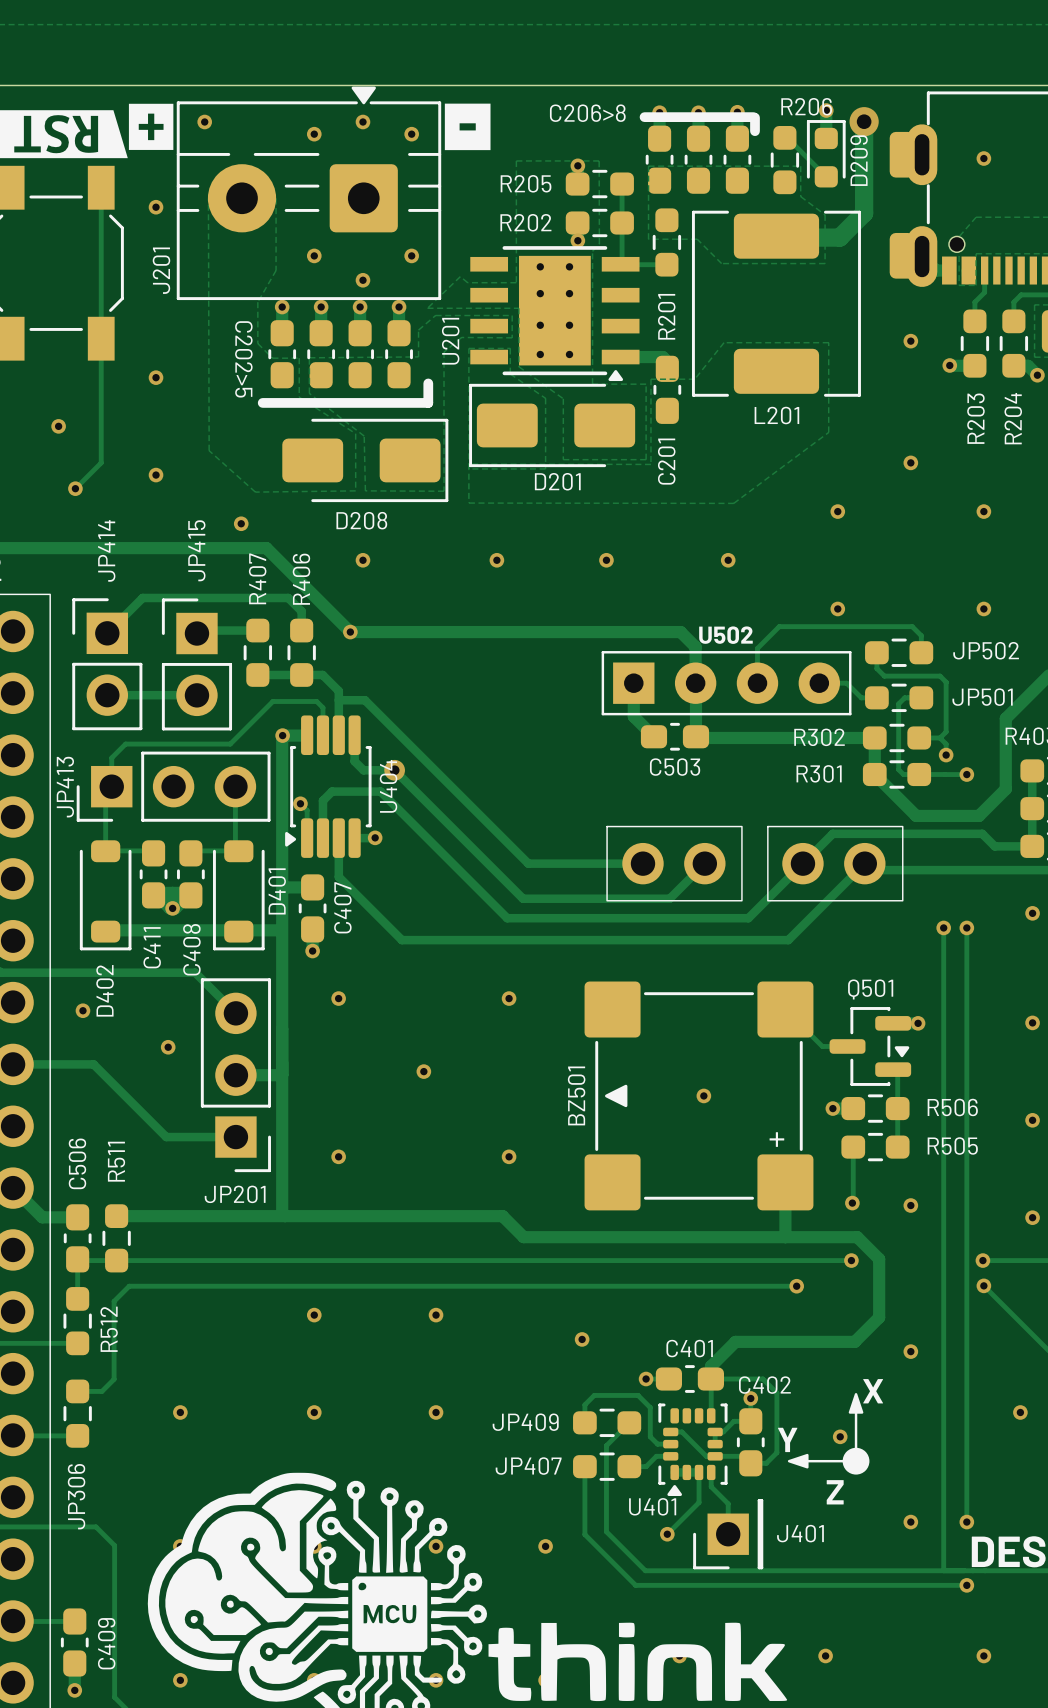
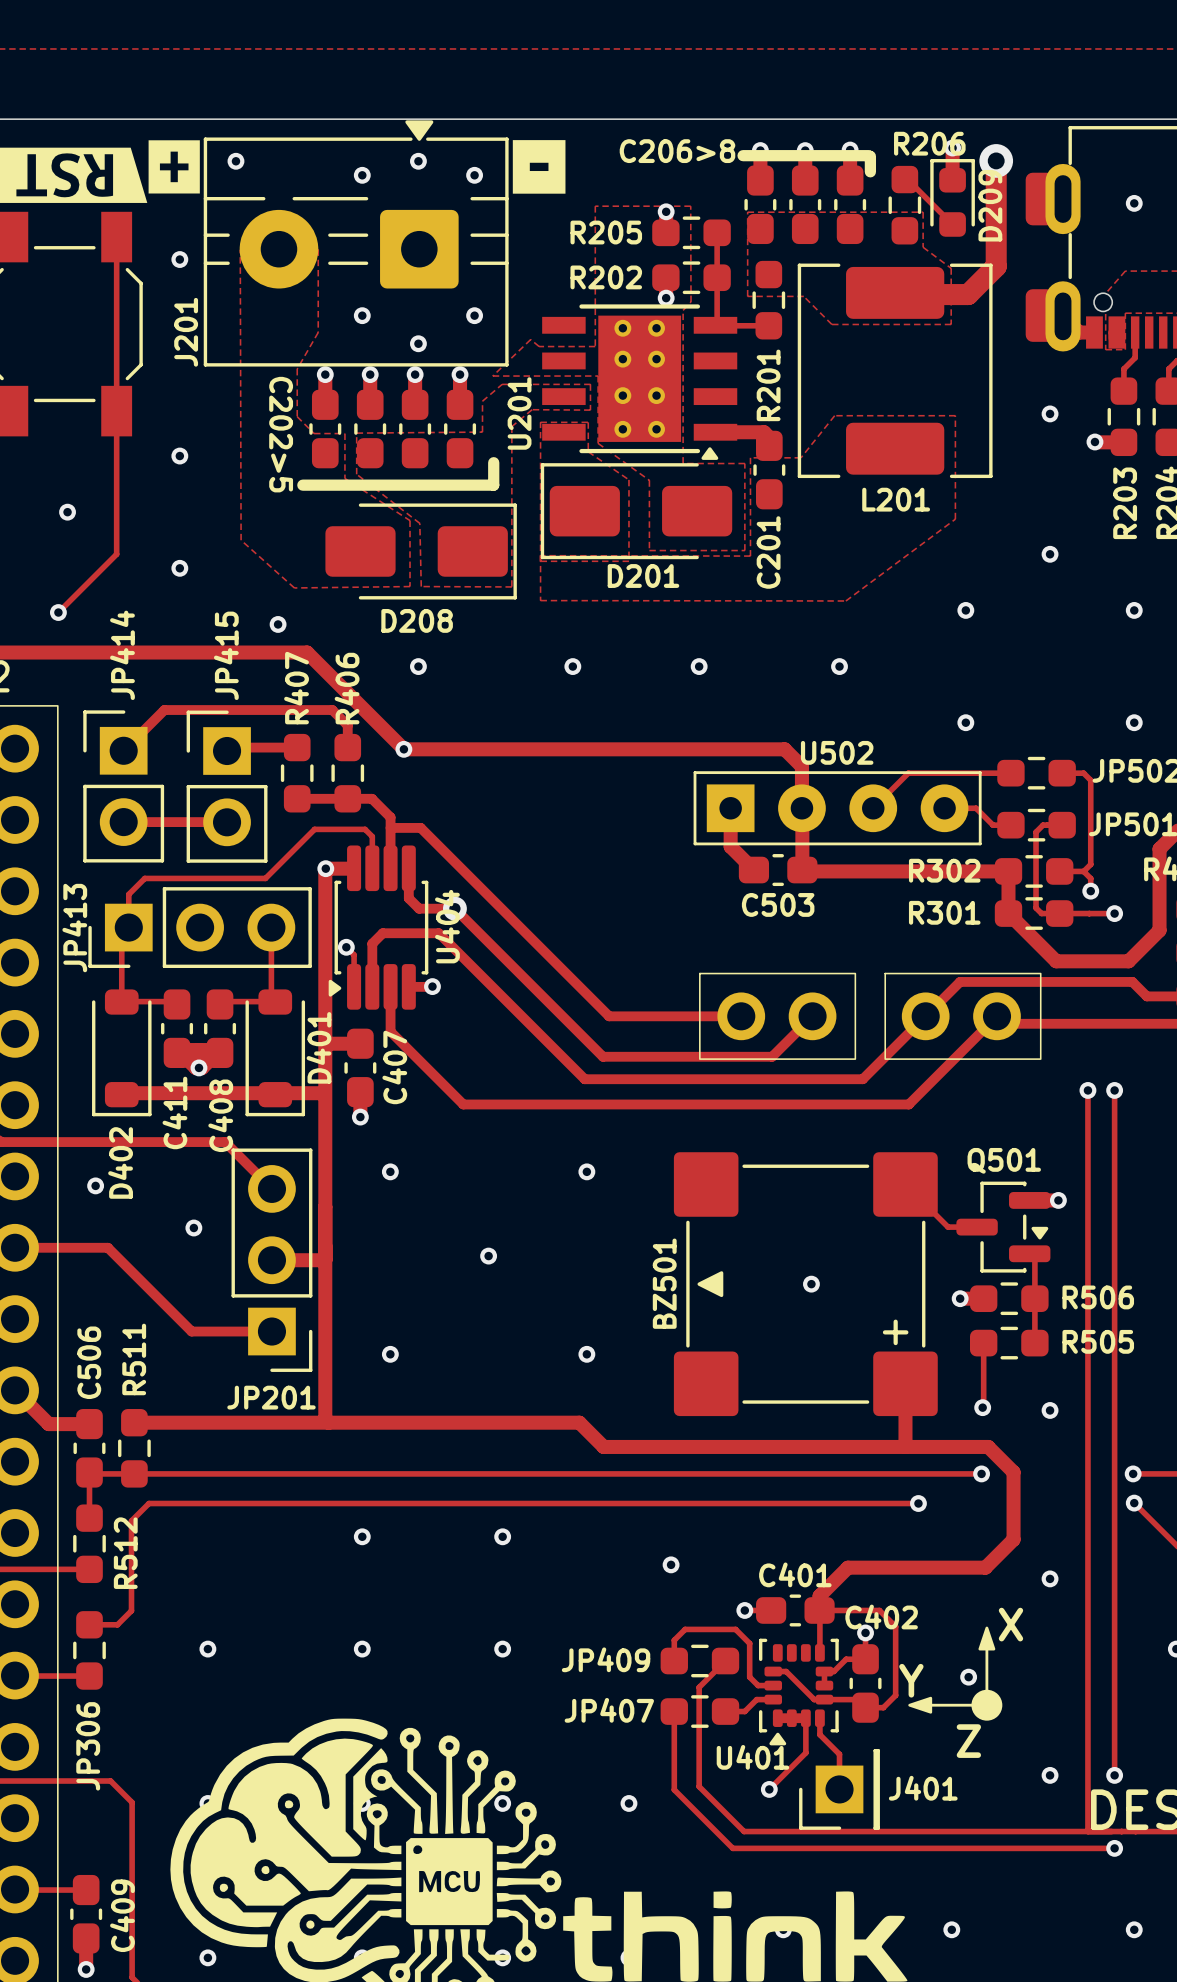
track: none -> (86, 584) (58, 612)
via position: (75, 488) -> (58, 612)
track: (876, 652) (876, 668) (884, 676) (940, 676) (946, 682) -> (1062, 773) (1083, 773) (1090, 780) (1090, 807)
track: (921, 652) (921, 635) (912, 626) (779, 626) (757, 648) (757, 683) -> (1010, 773) (908, 773) (873, 808)

